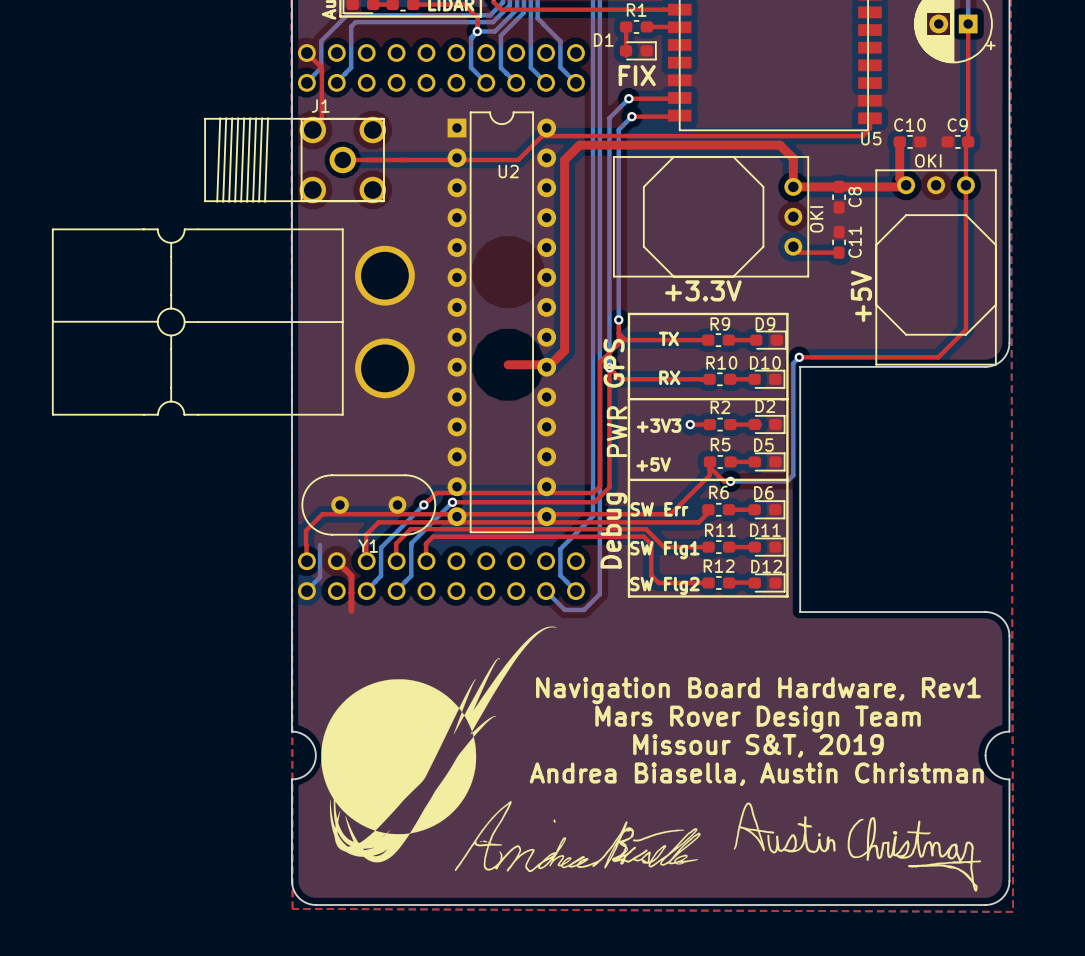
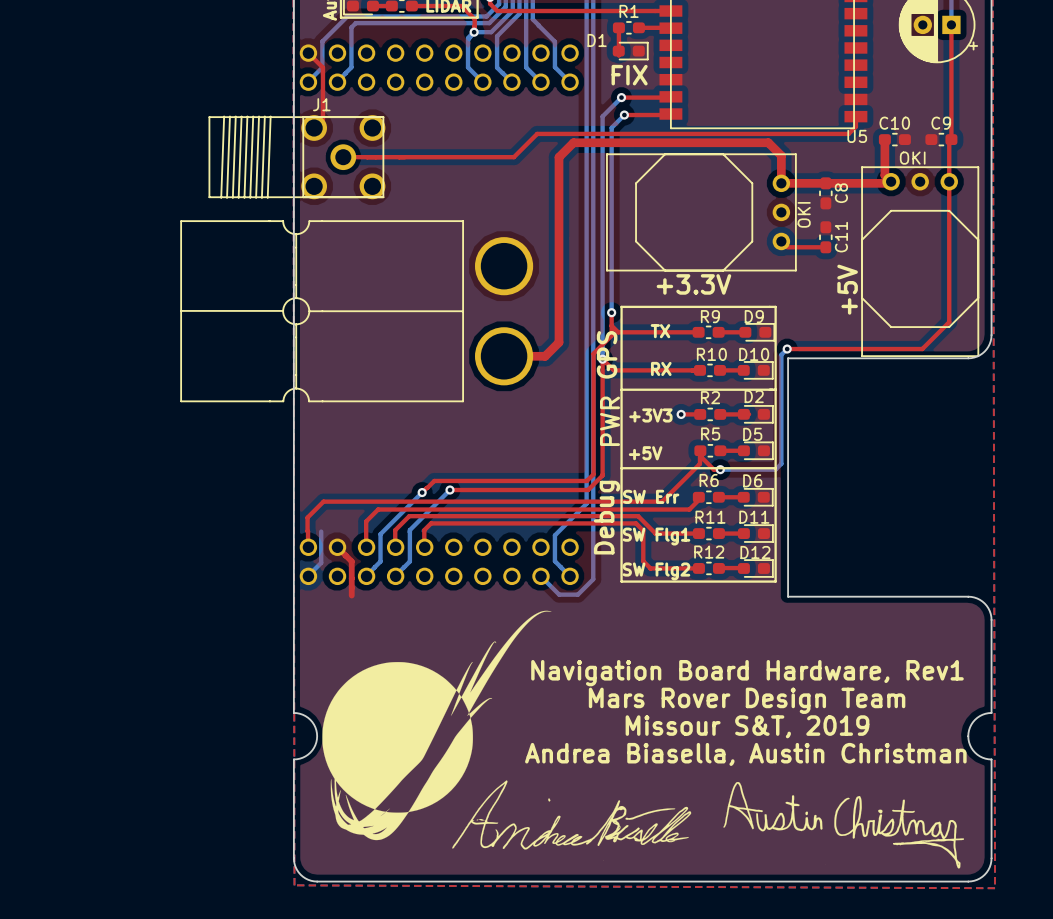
part position: (233, 322) -> (356, 311)
U2: (501, 322) -> none
Y1: (368, 504) -> none

